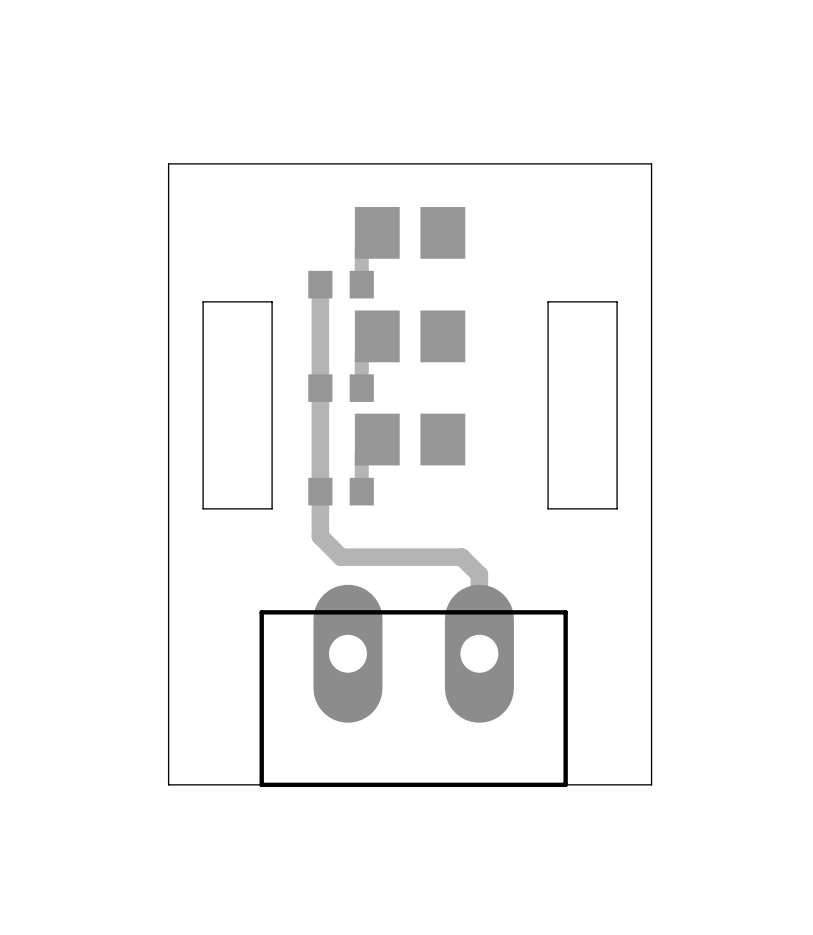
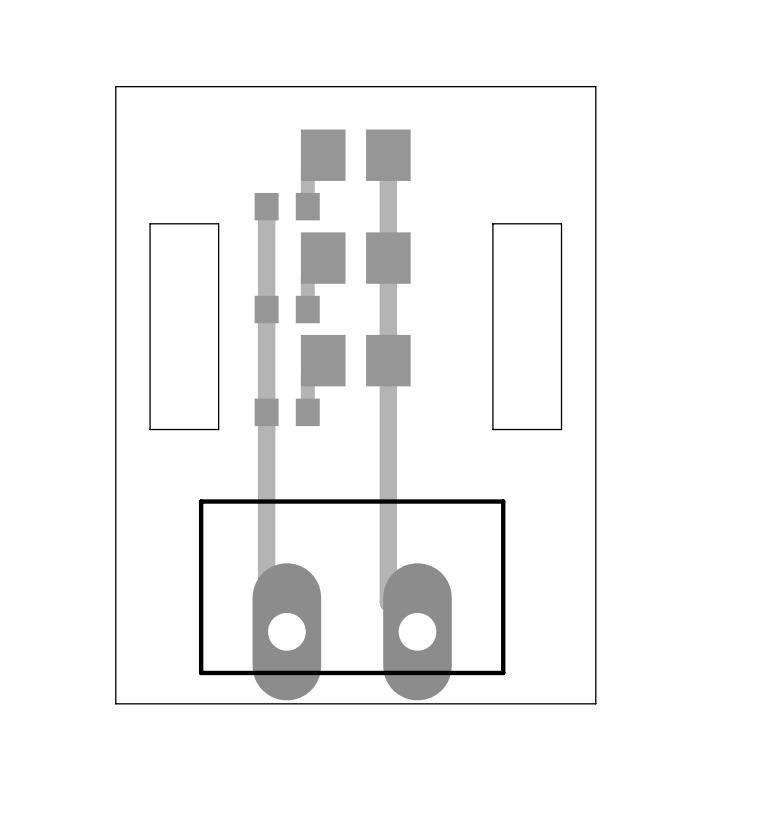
track: none -> (388, 155) (388, 602) (417, 631)
track: (320, 536) (341, 557) (461, 557) (479, 574) (479, 653) -> (266, 456) (266, 611) (286, 631)
part rotation: 0° (413, 685) -> 180° (352, 599)

